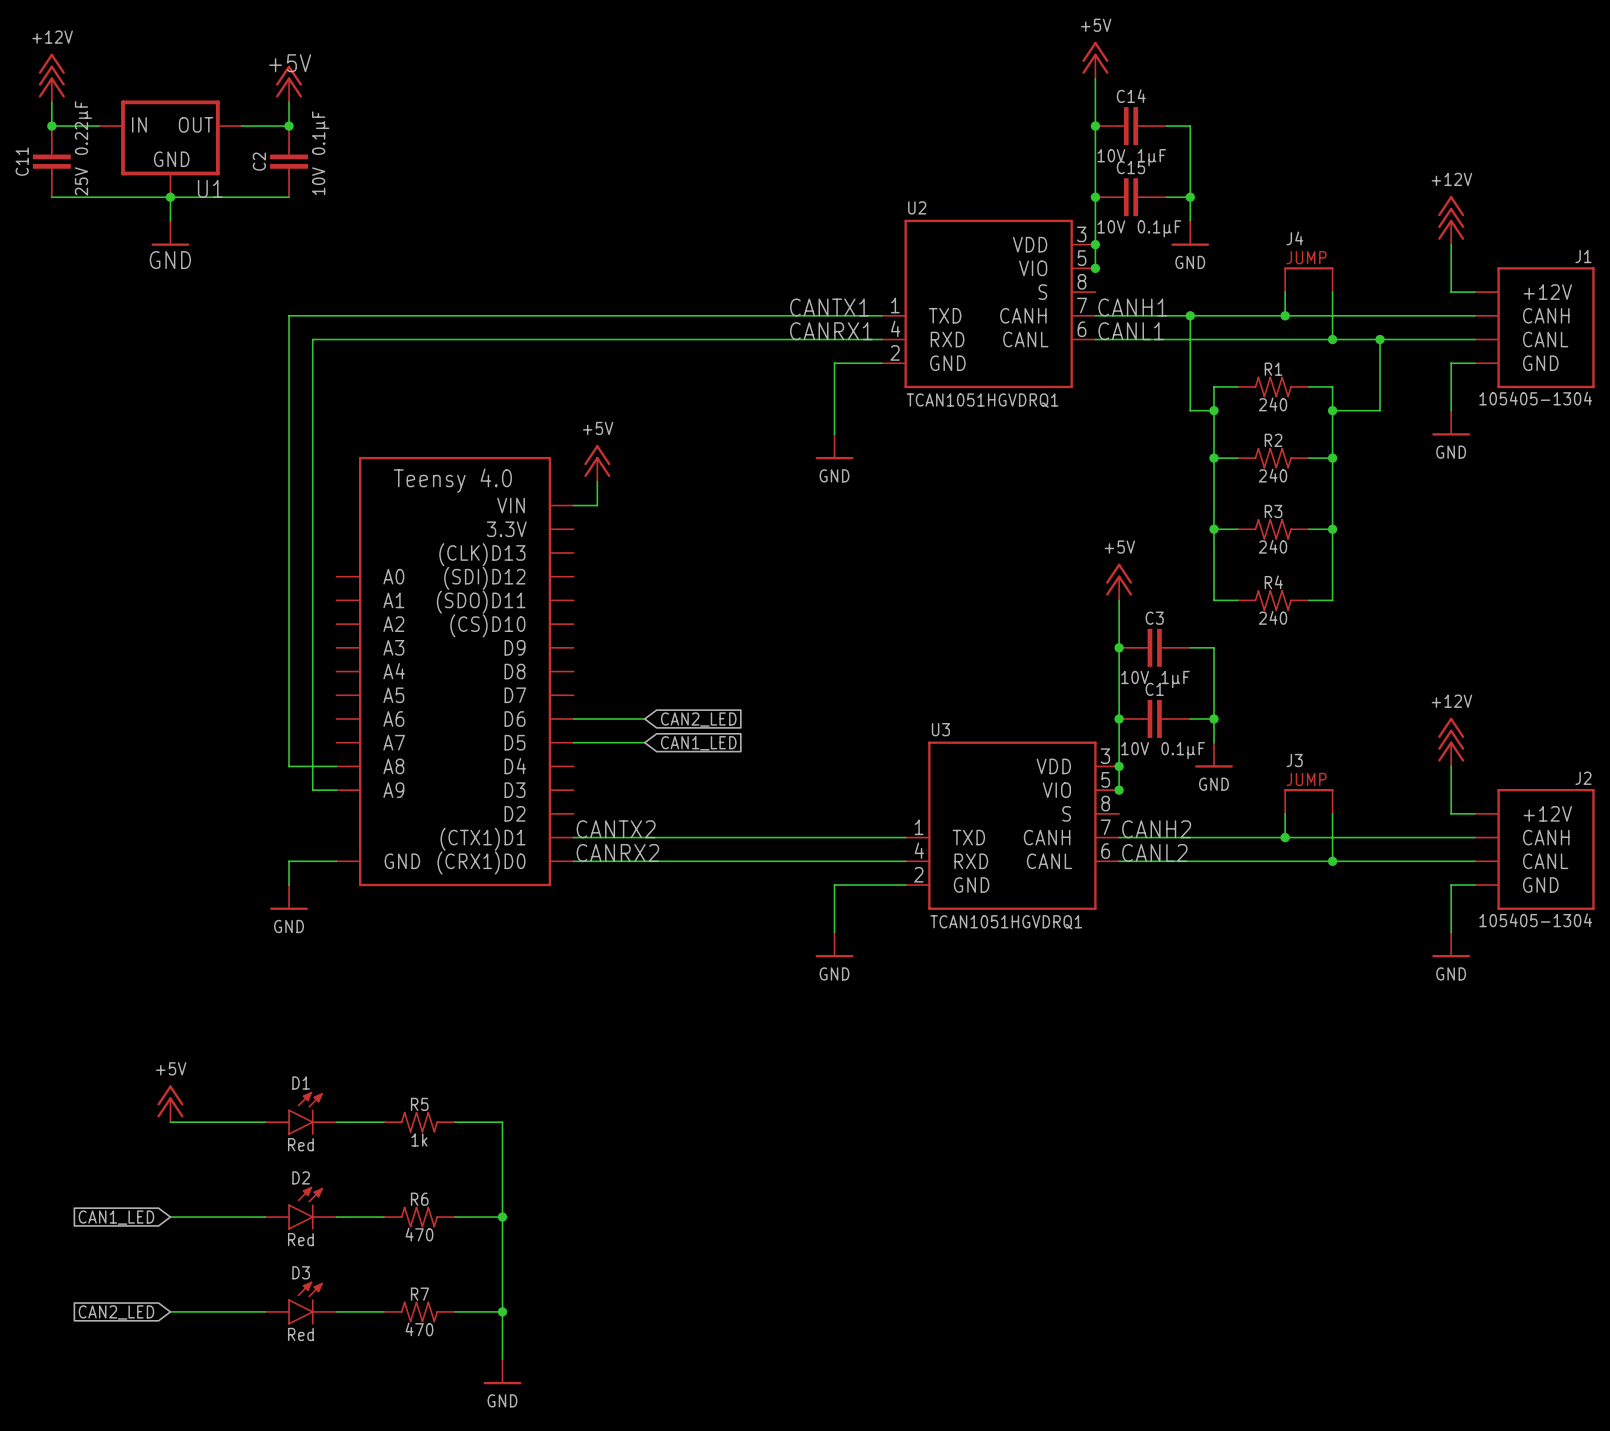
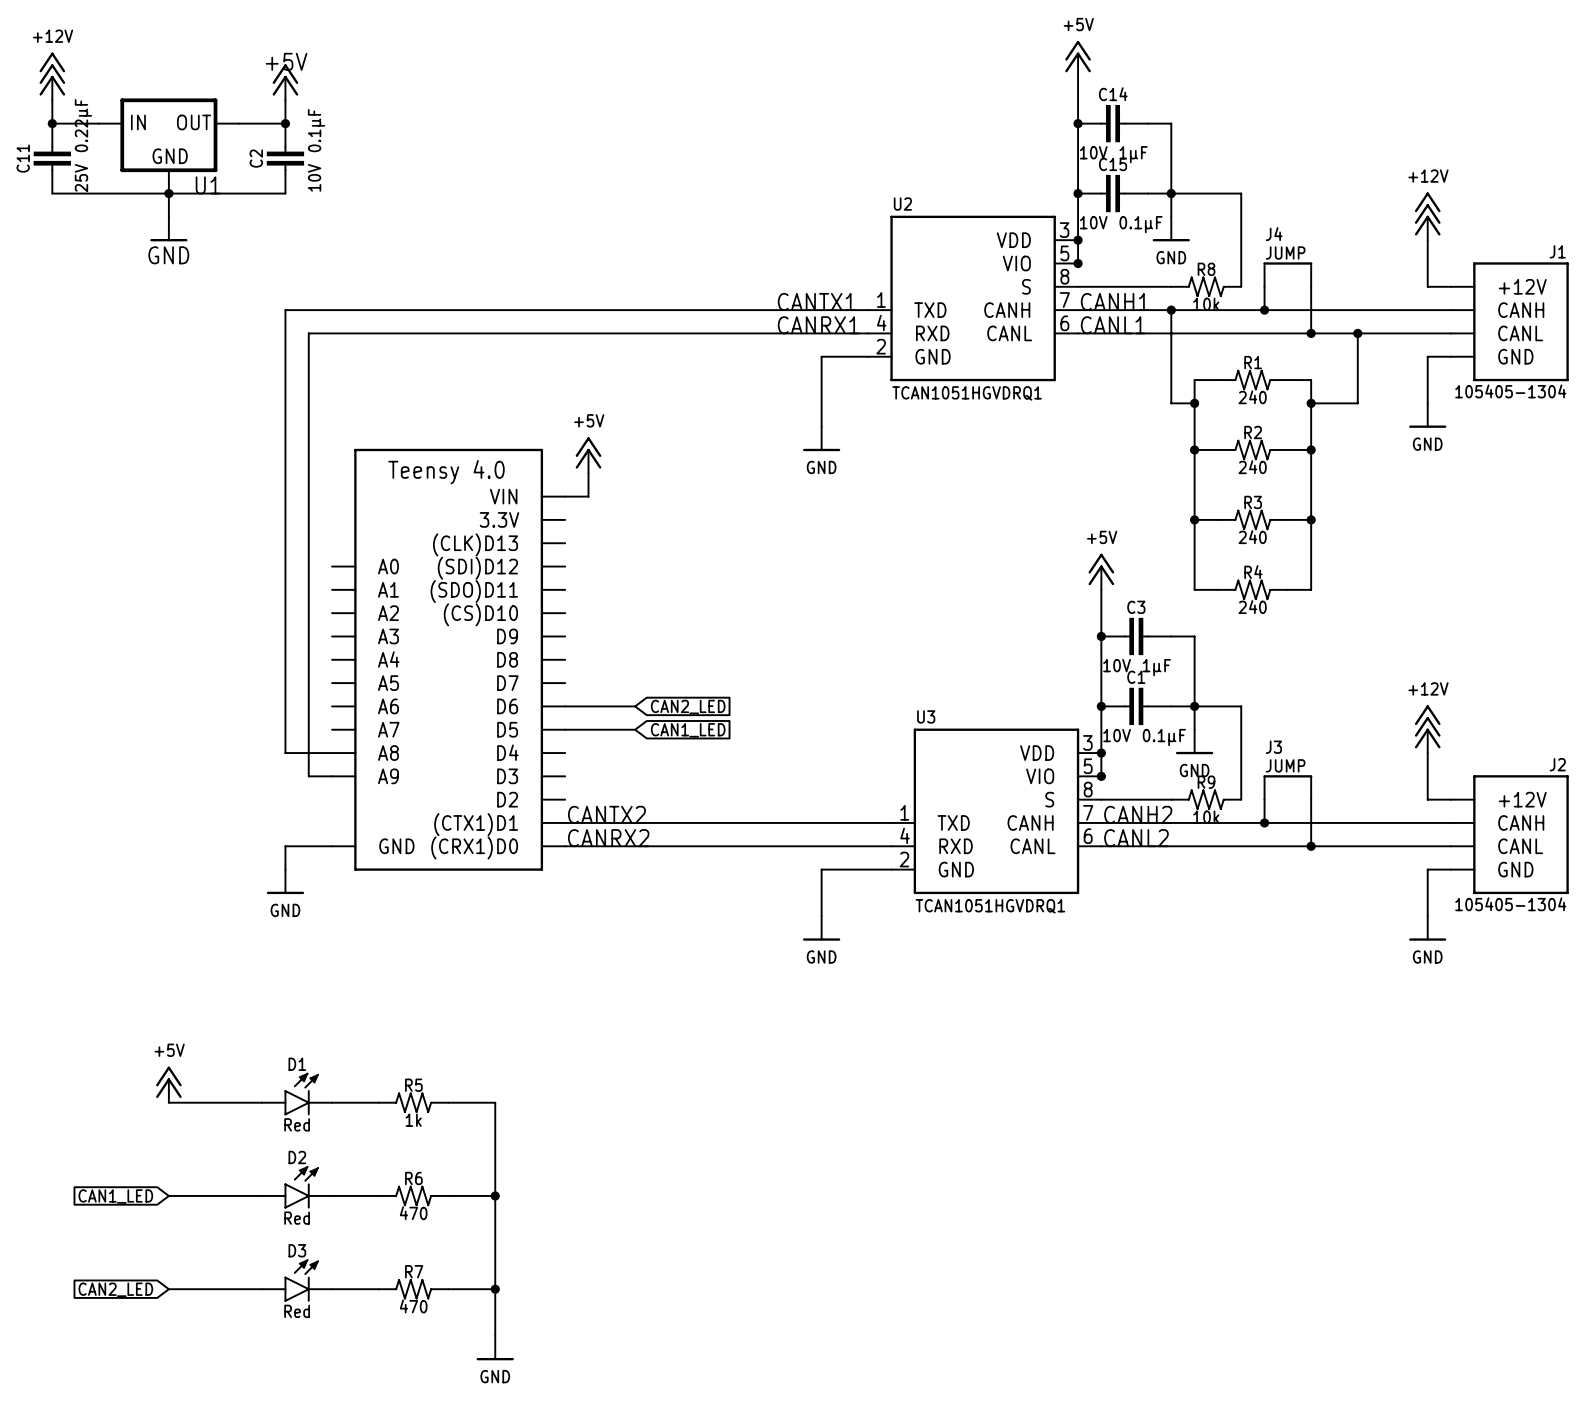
wire: none -> (1171, 193) (1241, 193) (1241, 286)
wire: none -> (1078, 286) (1171, 286)
R8: none -> (1206, 286)
wire: none -> (1194, 706) (1241, 706) (1241, 799)
wire: none -> (1101, 799) (1171, 799)
R9: none -> (1206, 799)

